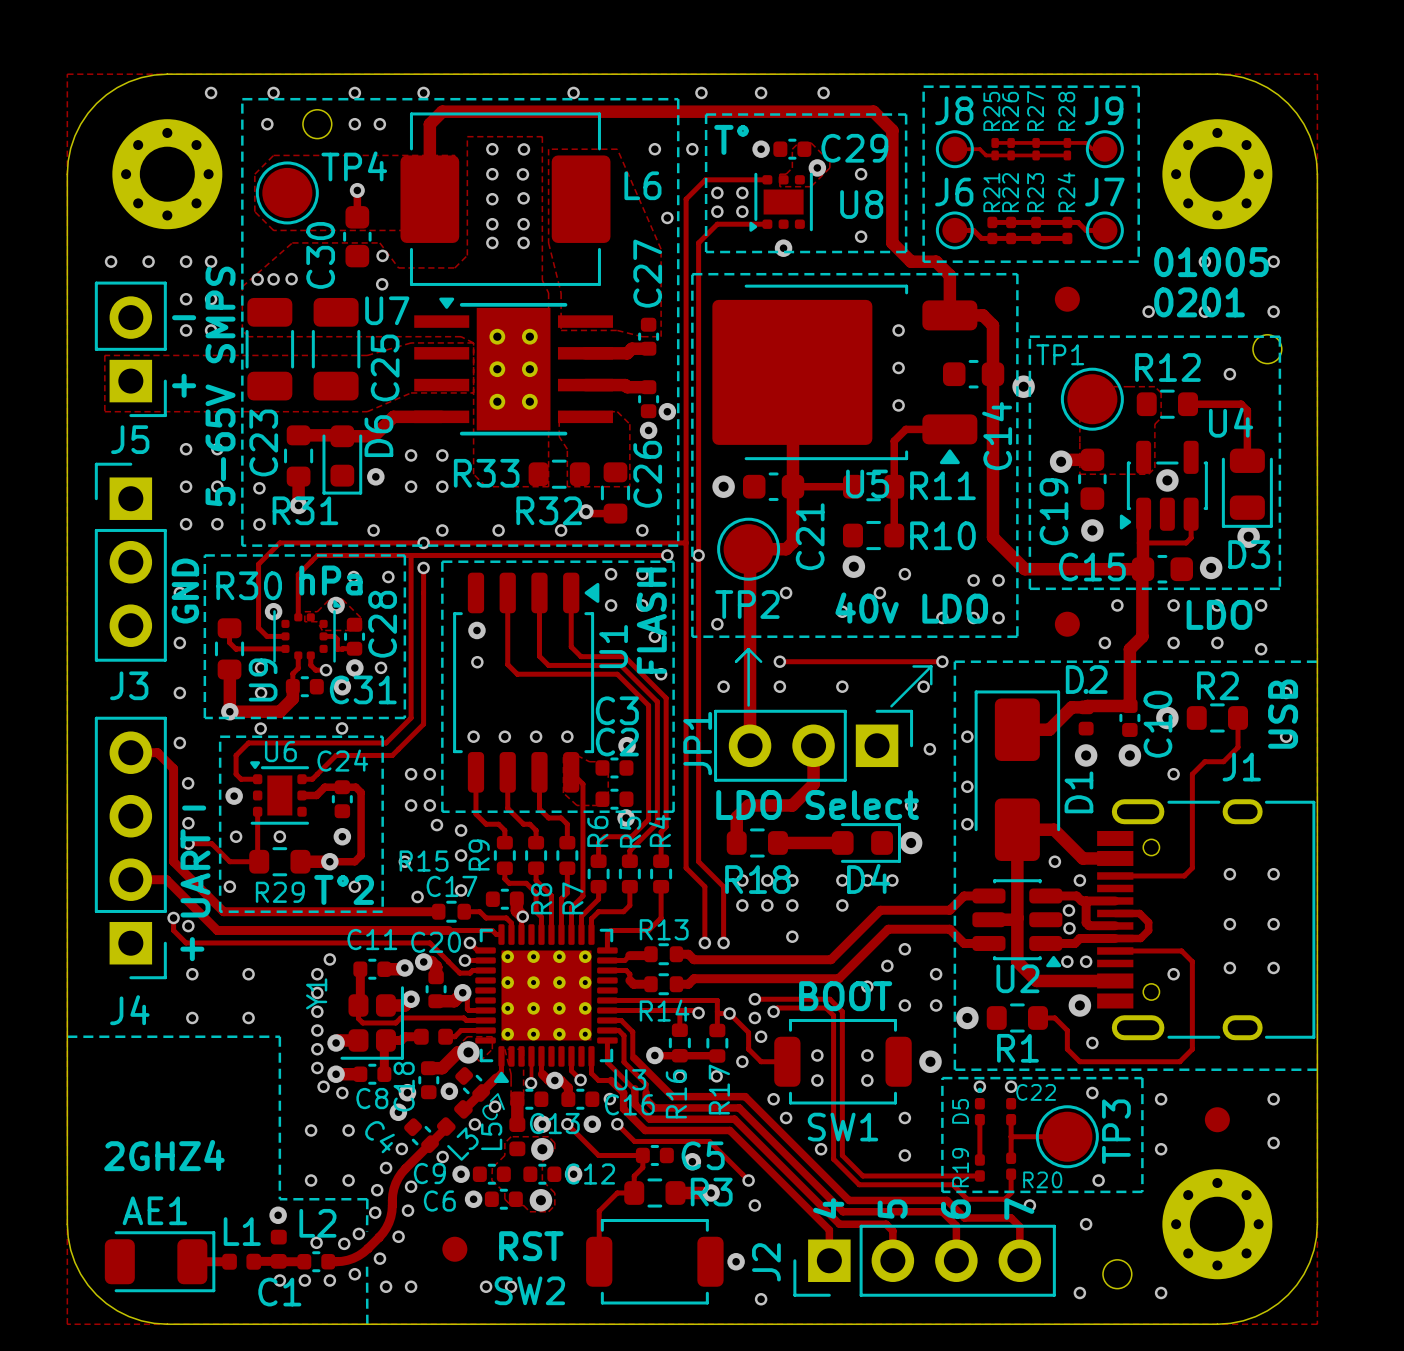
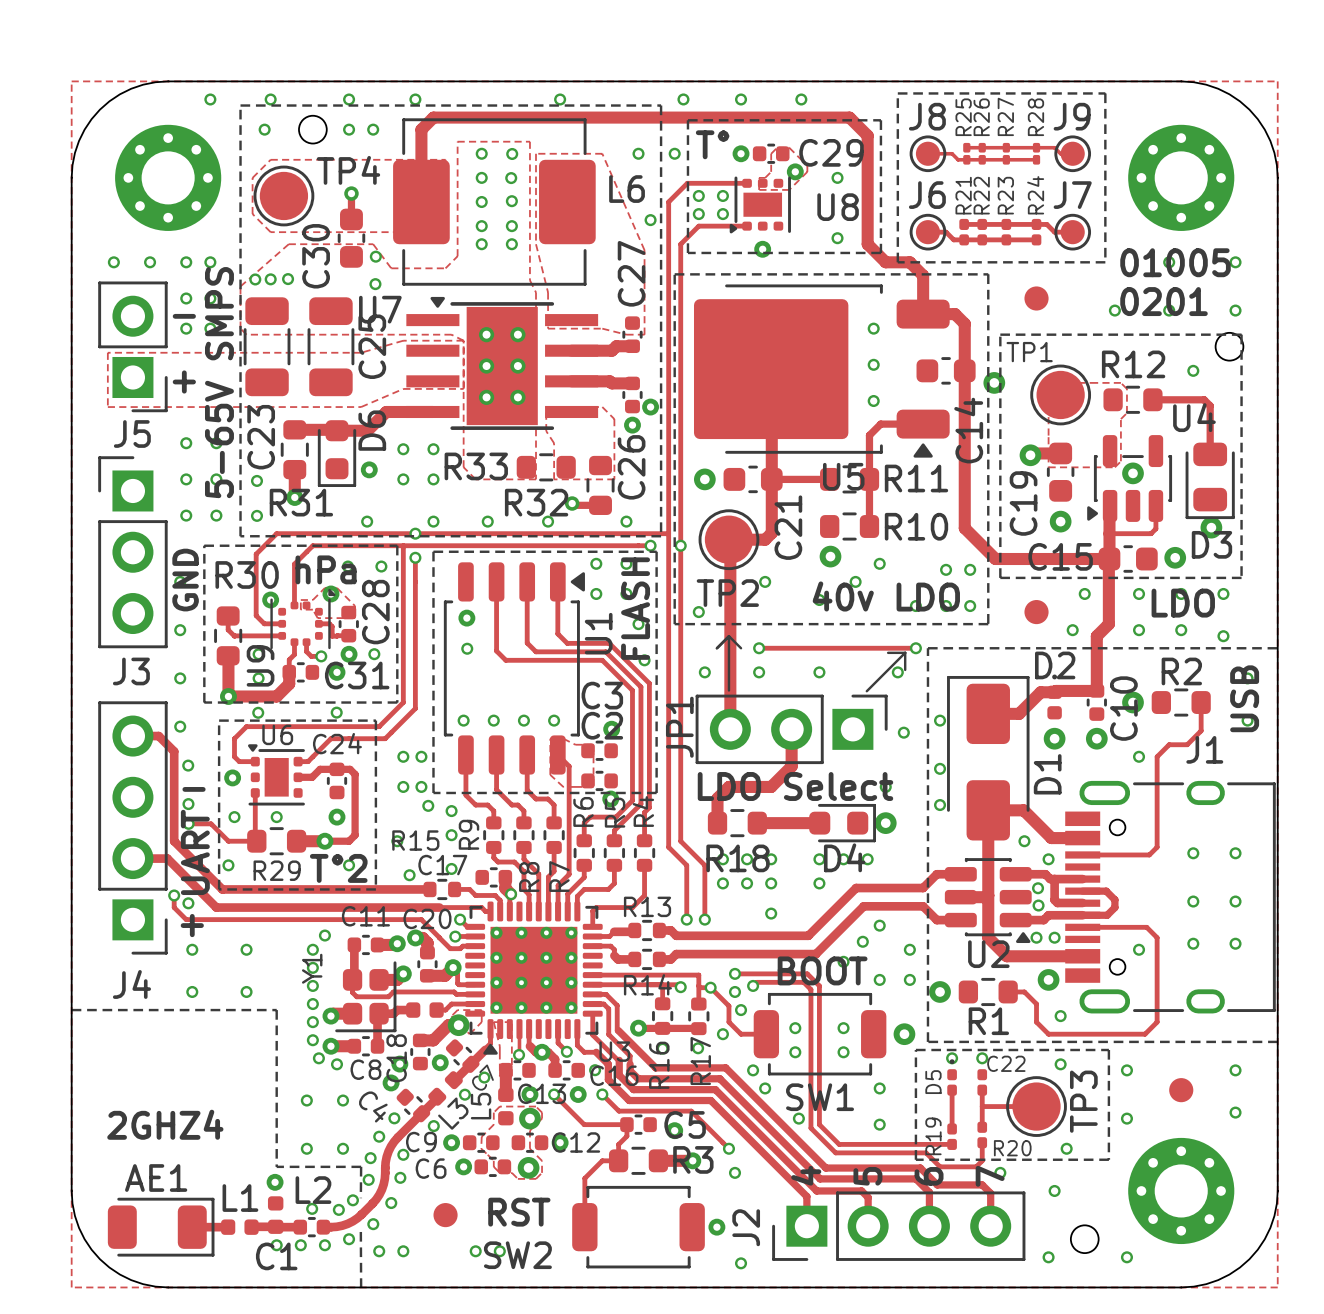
C25 name position: C25 (385, 367) -> C25 (372, 346)

